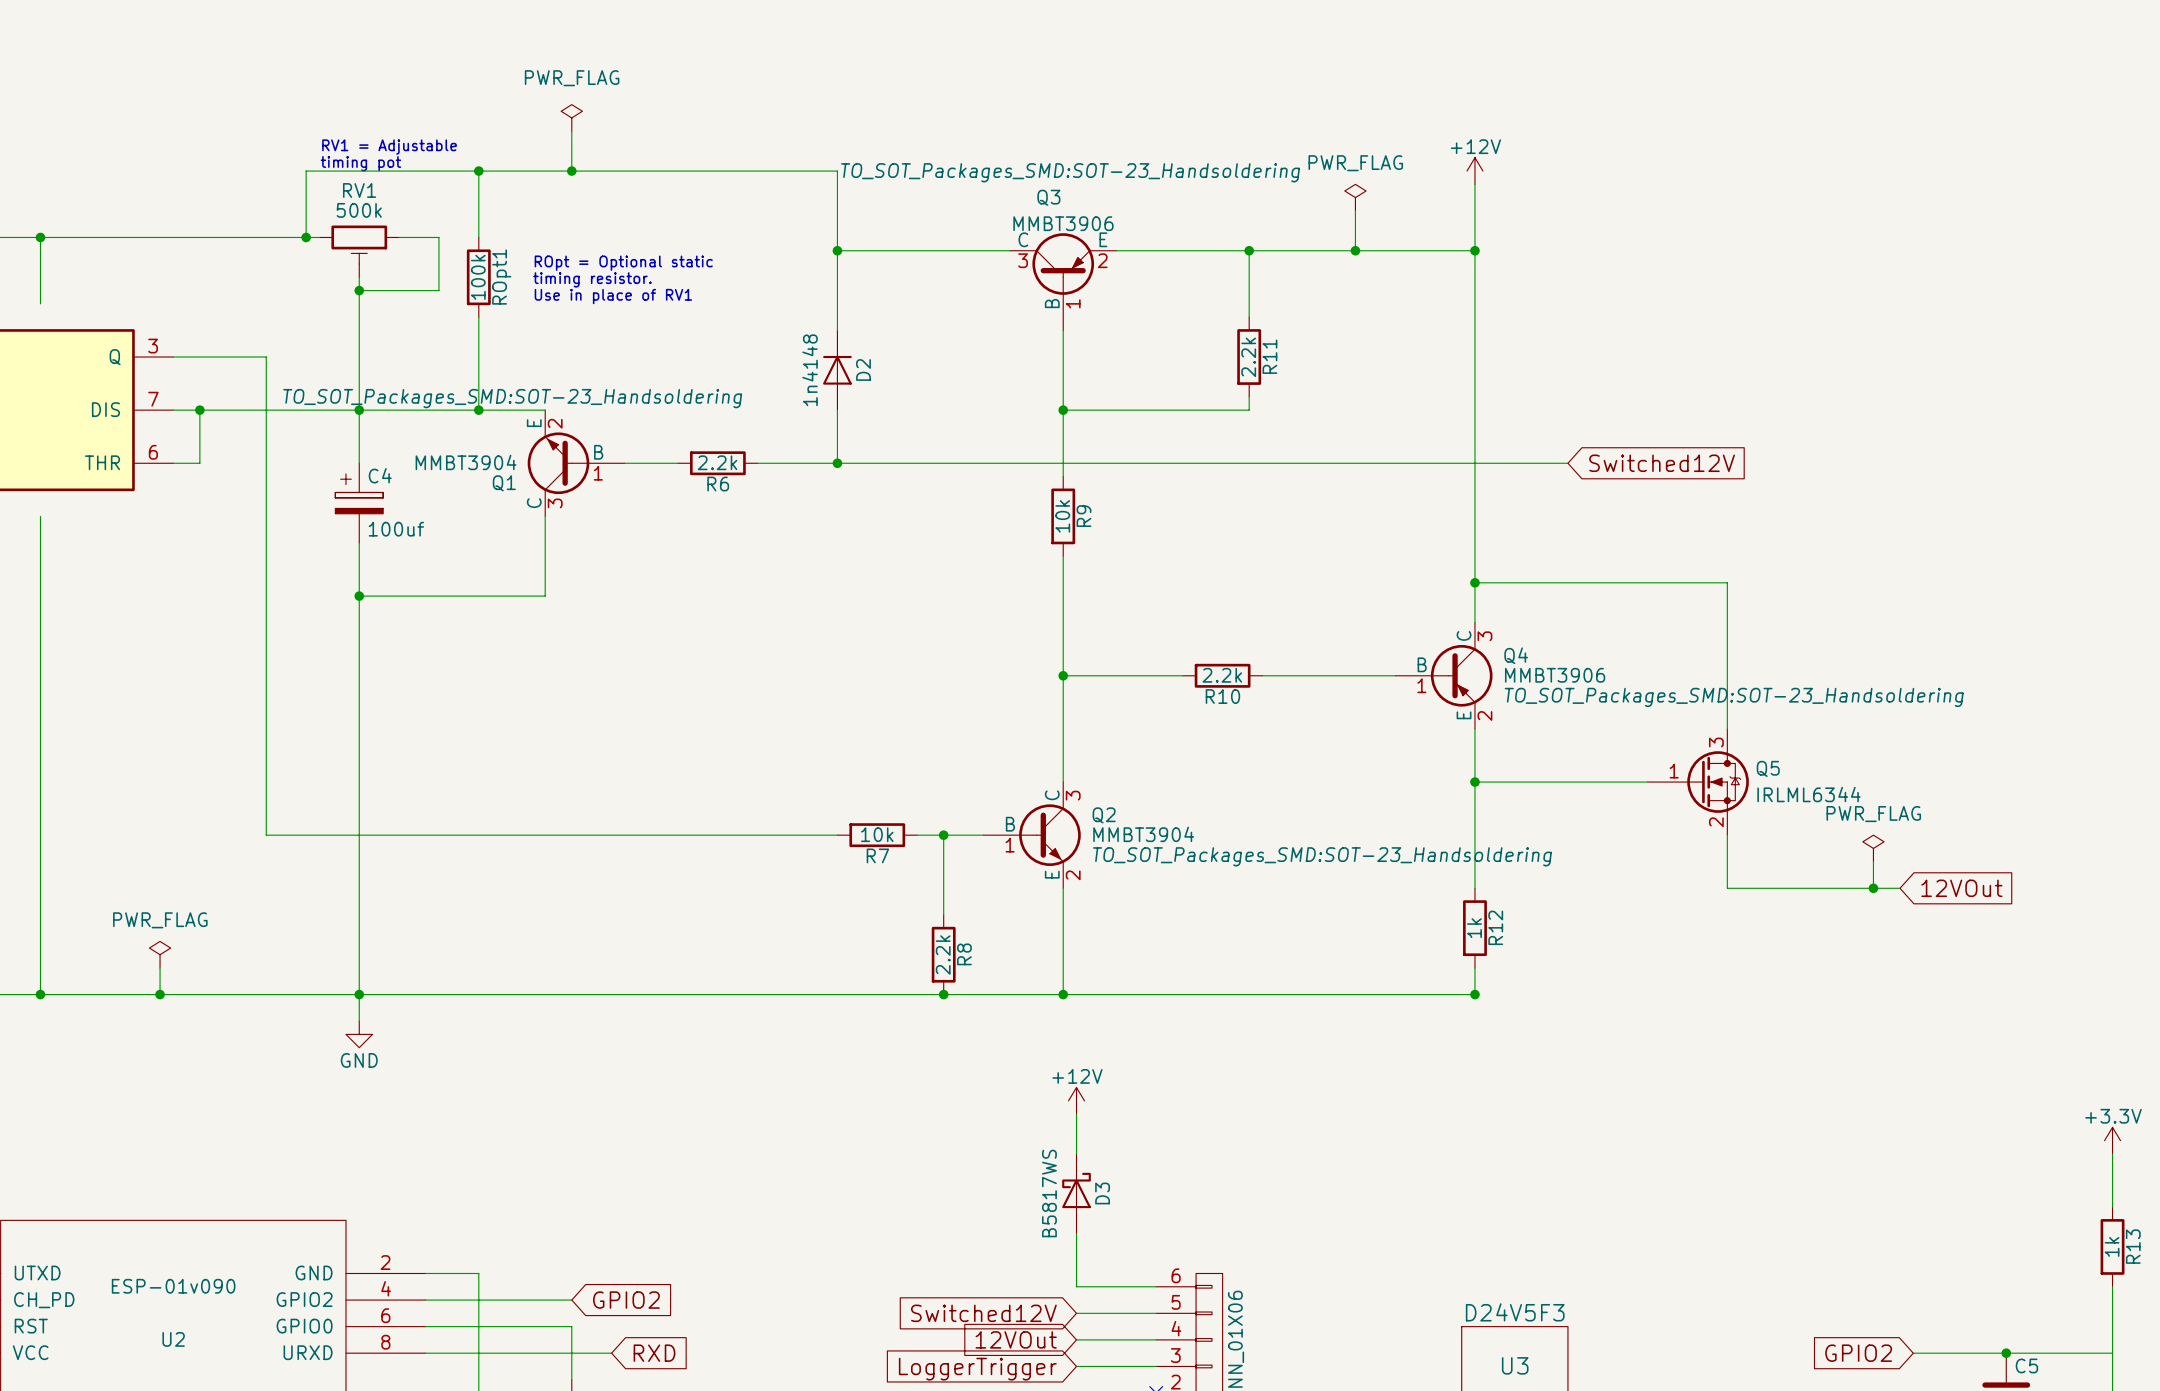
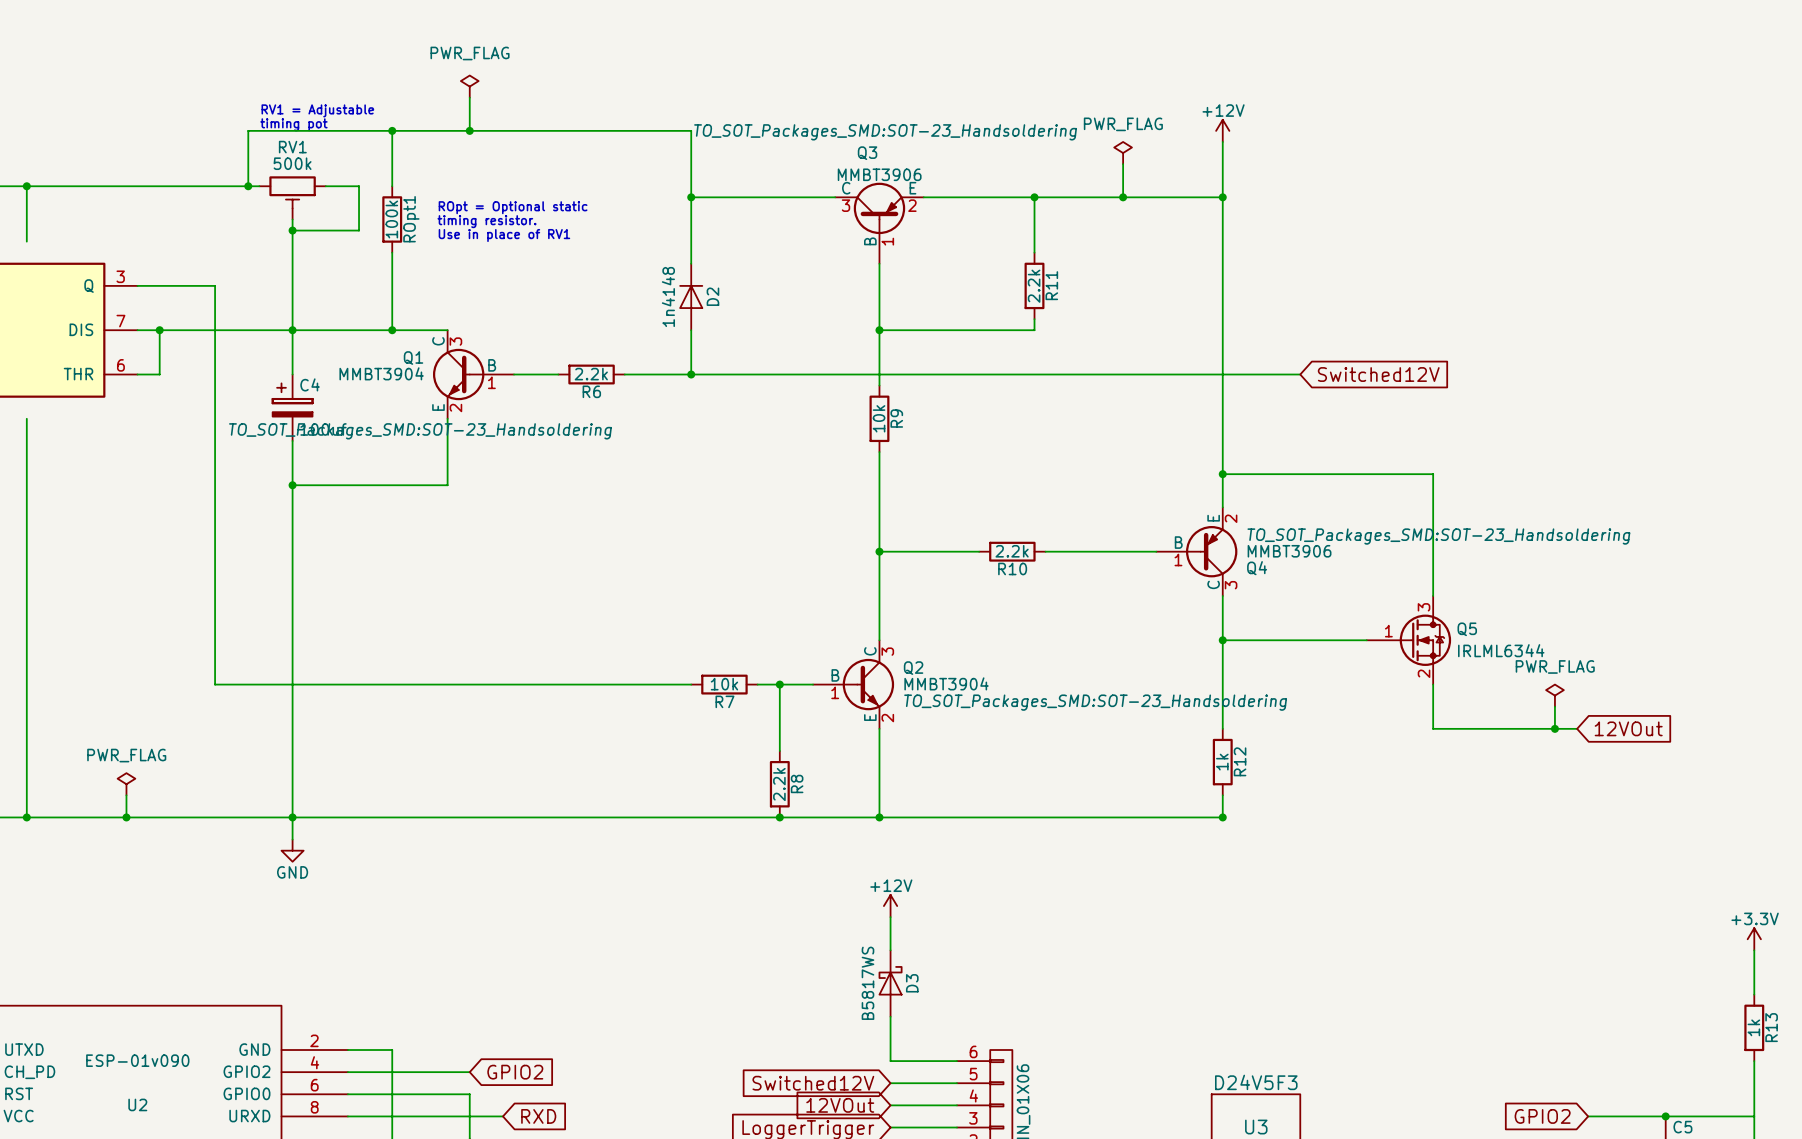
Q1 flip: as is (558, 463) -> up-down (458, 374)
Q4 flip: as is (1461, 675) -> up-down (1211, 551)

